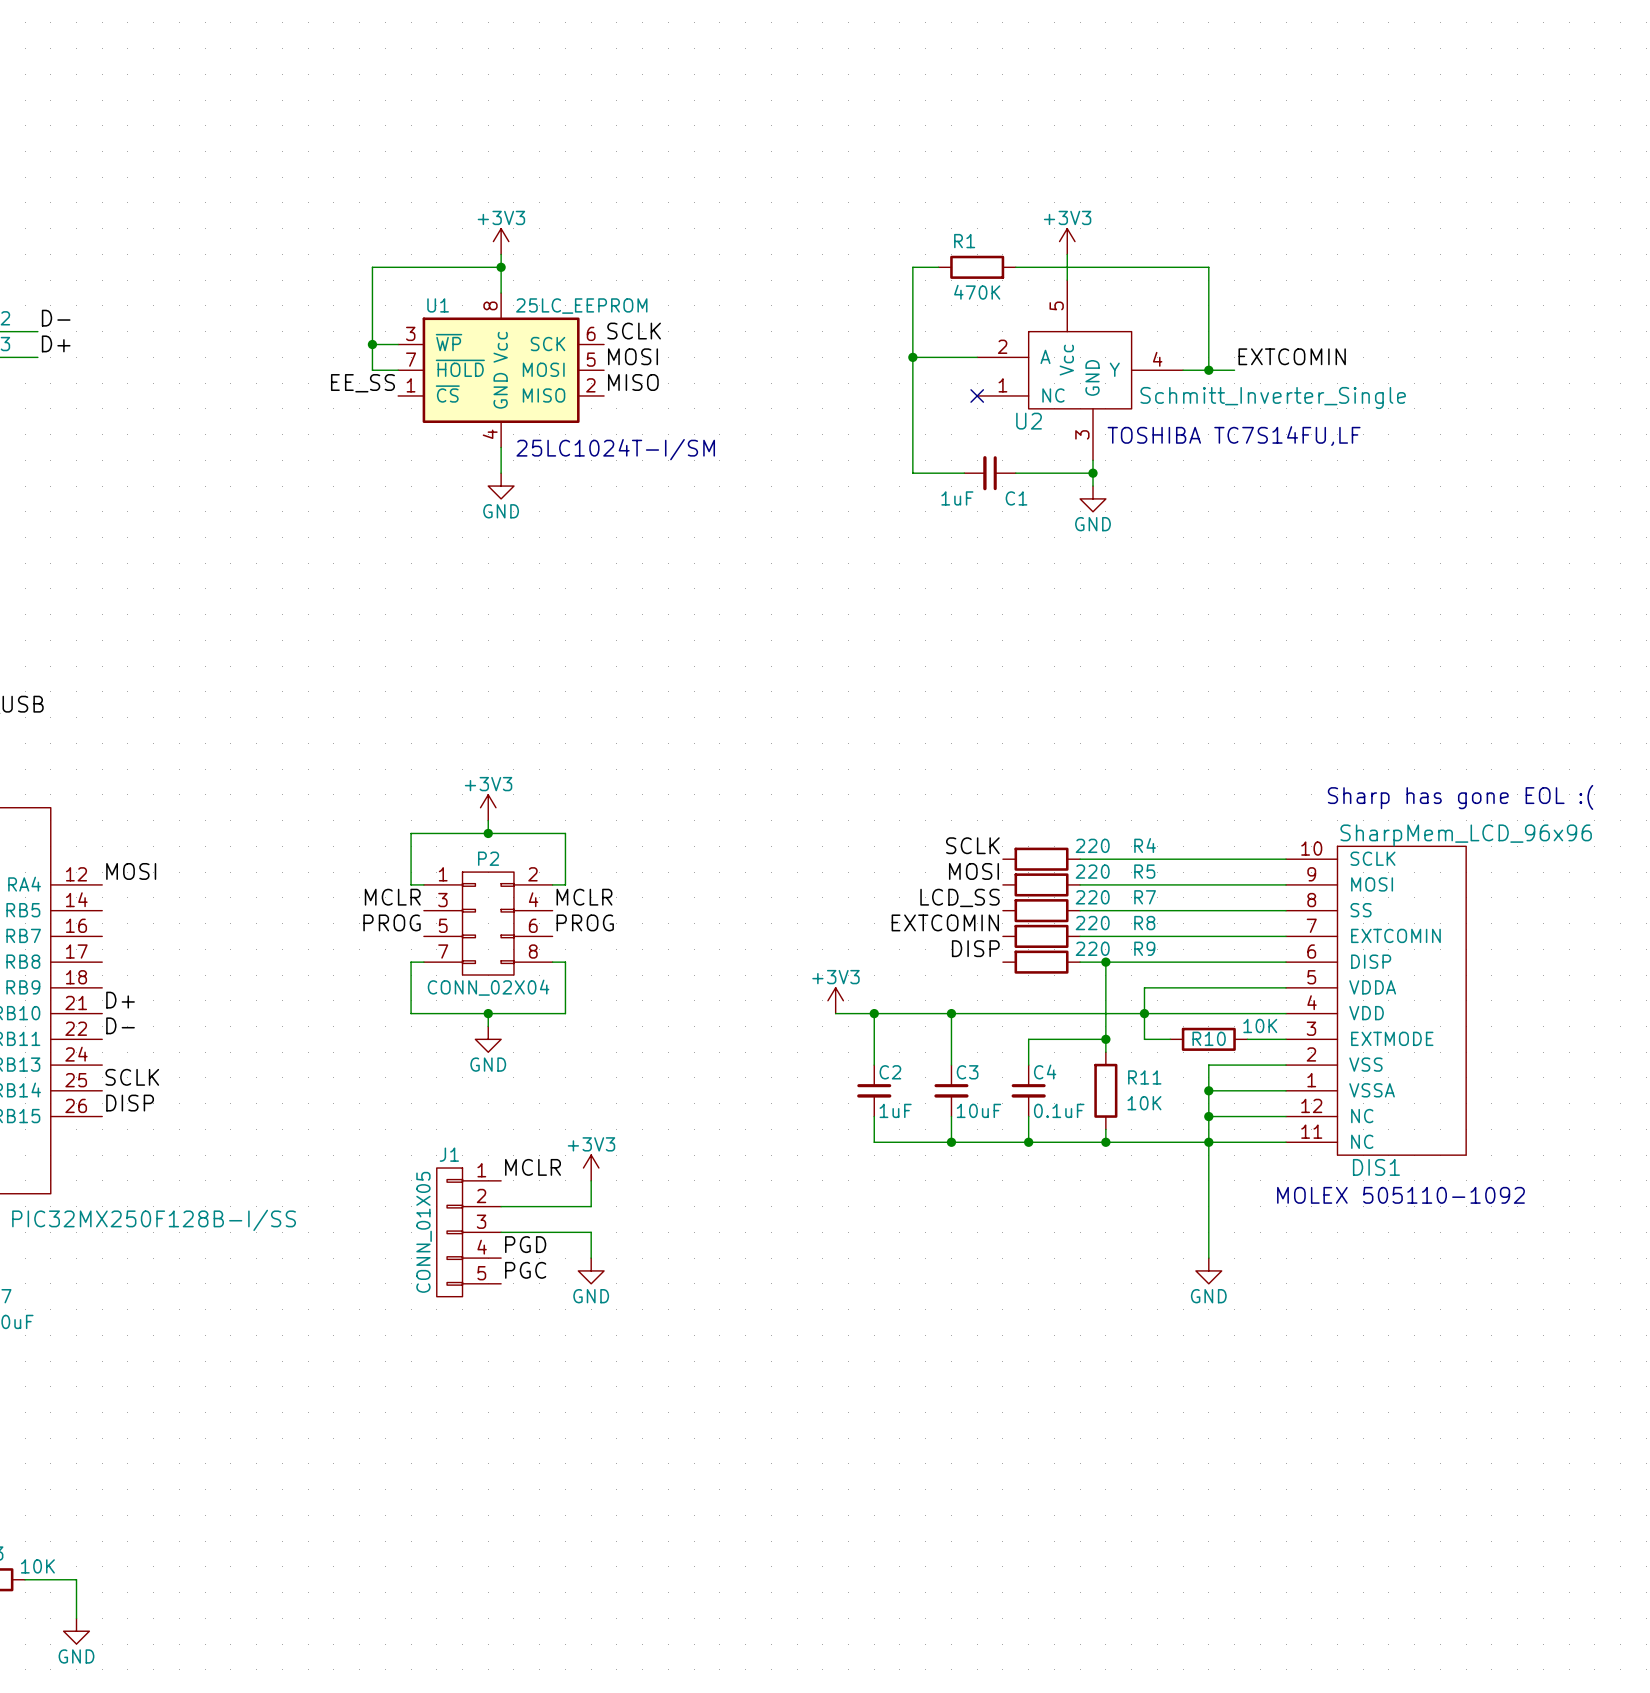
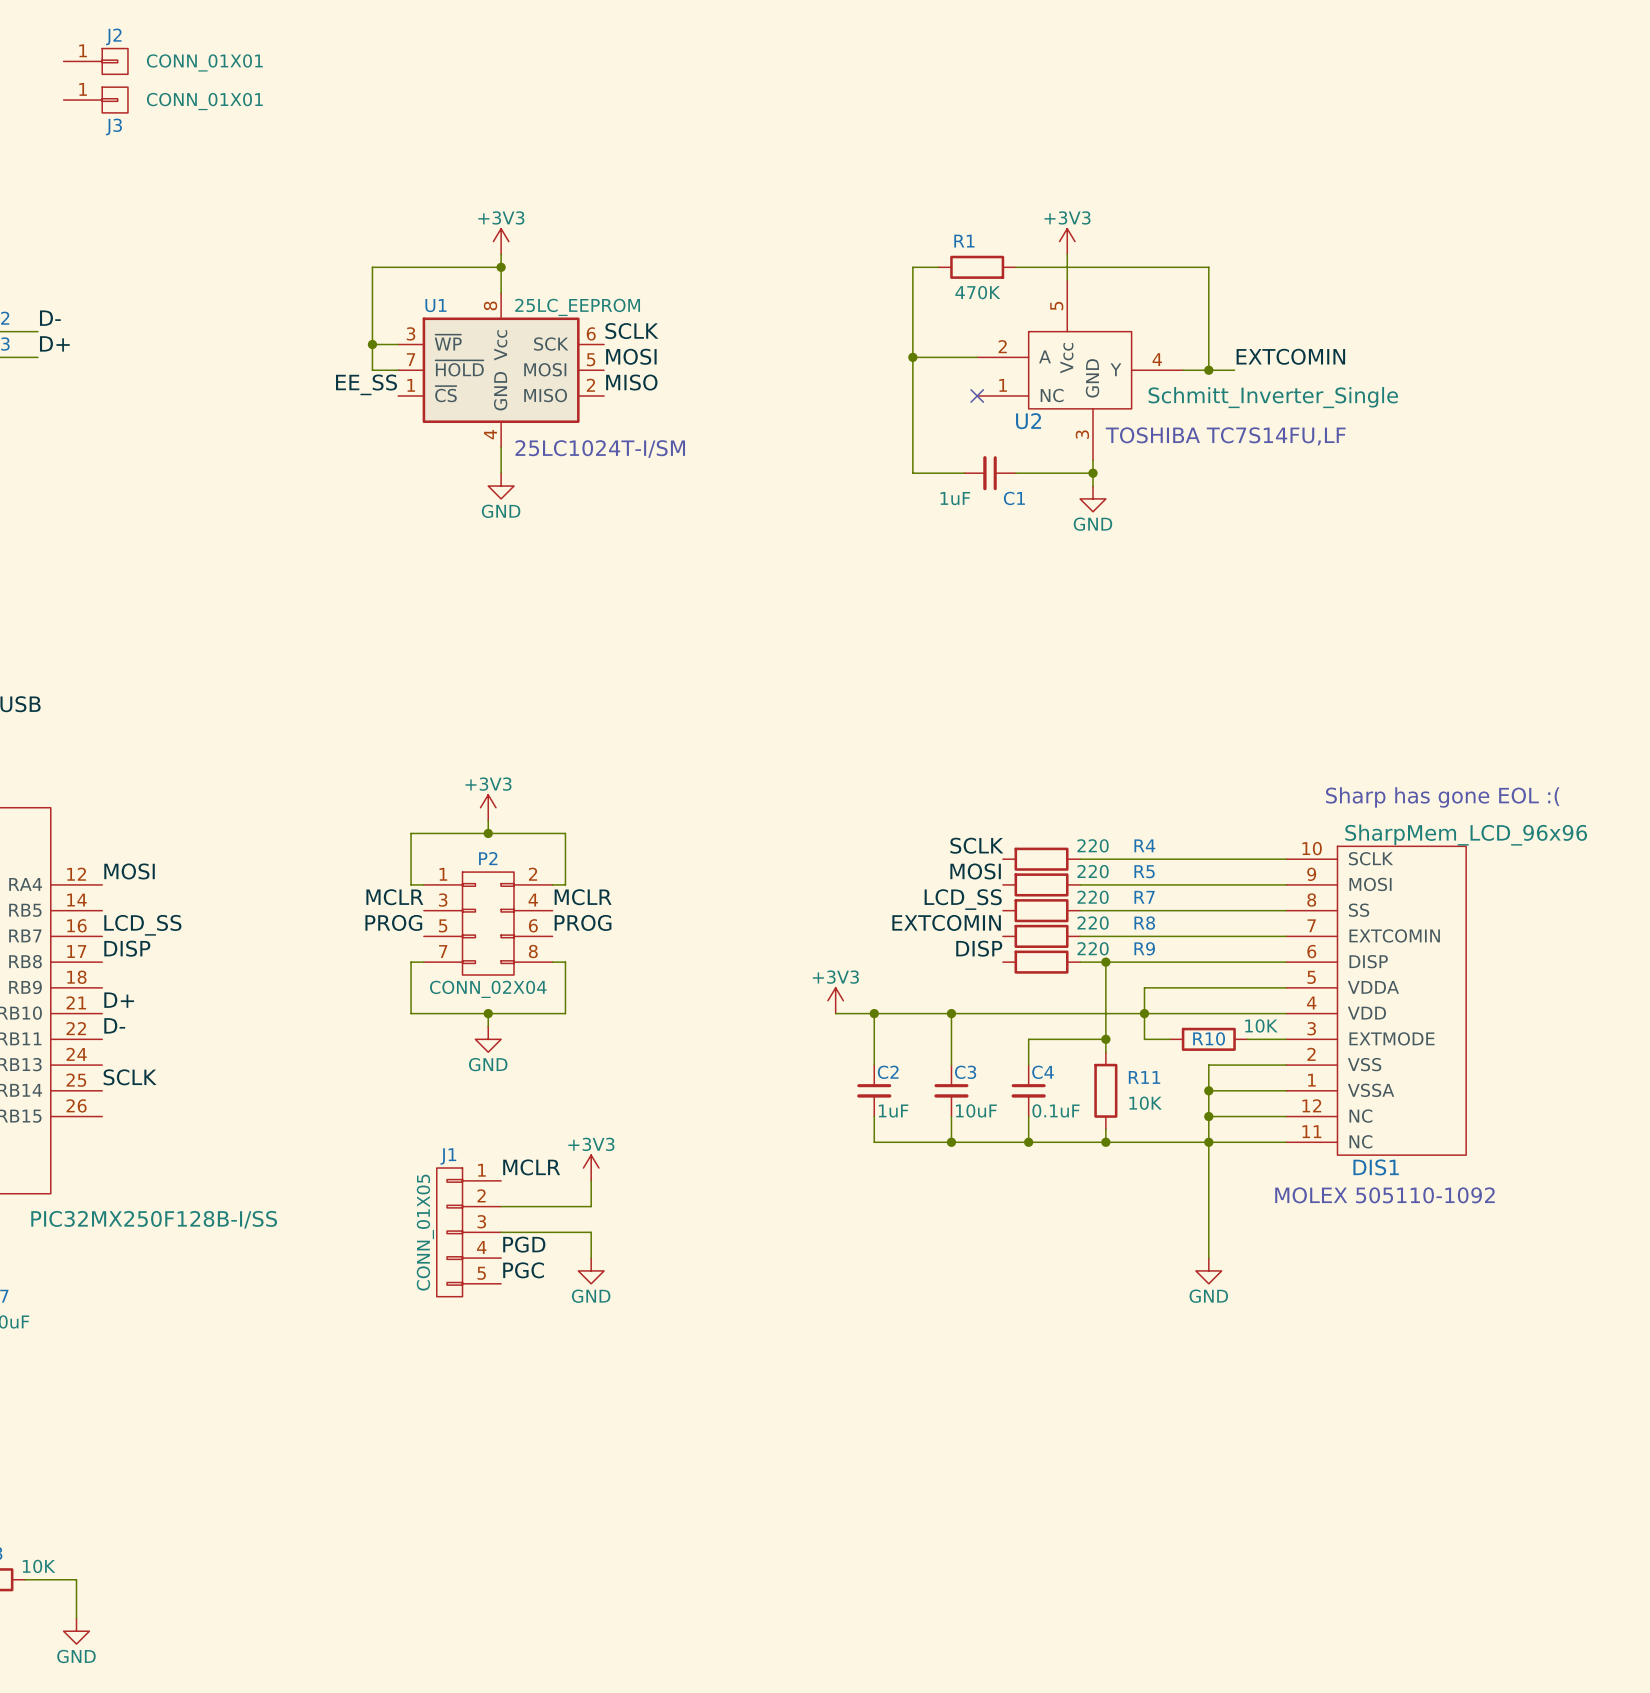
J2: none -> CONN_01X01 (95, 61)
J3: none -> CONN_01X01 (95, 100)
label: none -> LCD_SS (142, 925)
label position: DISP (130, 1103) -> DISP (127, 948)

